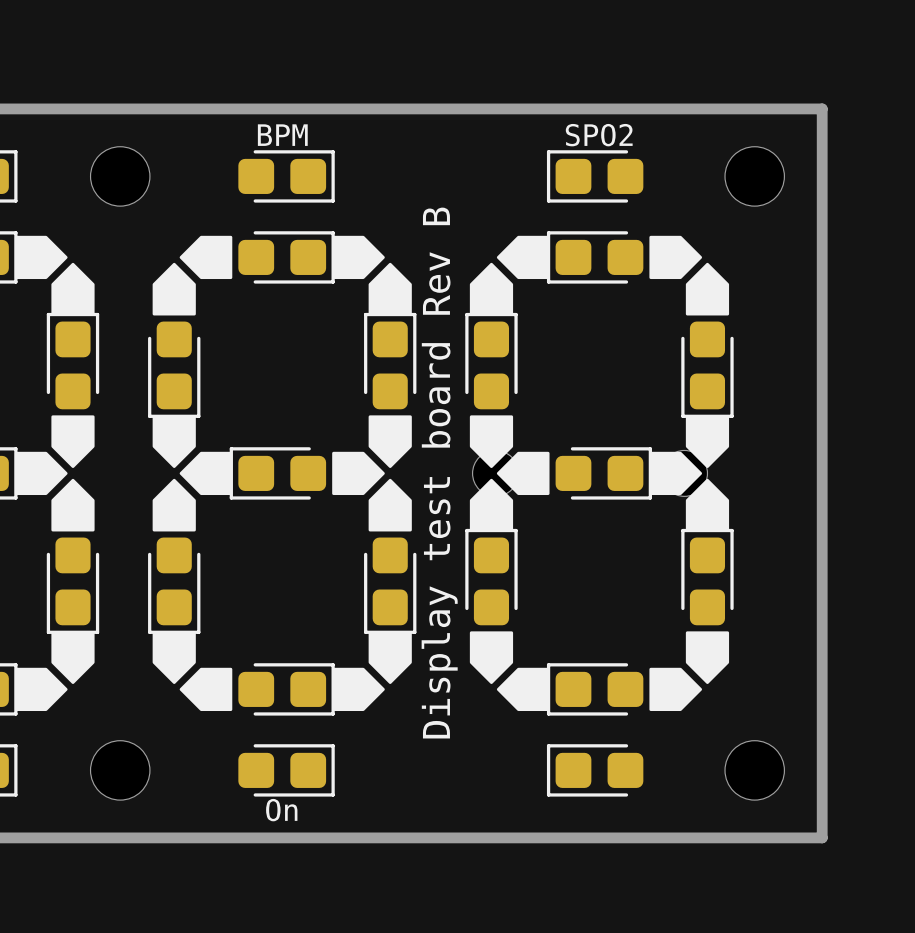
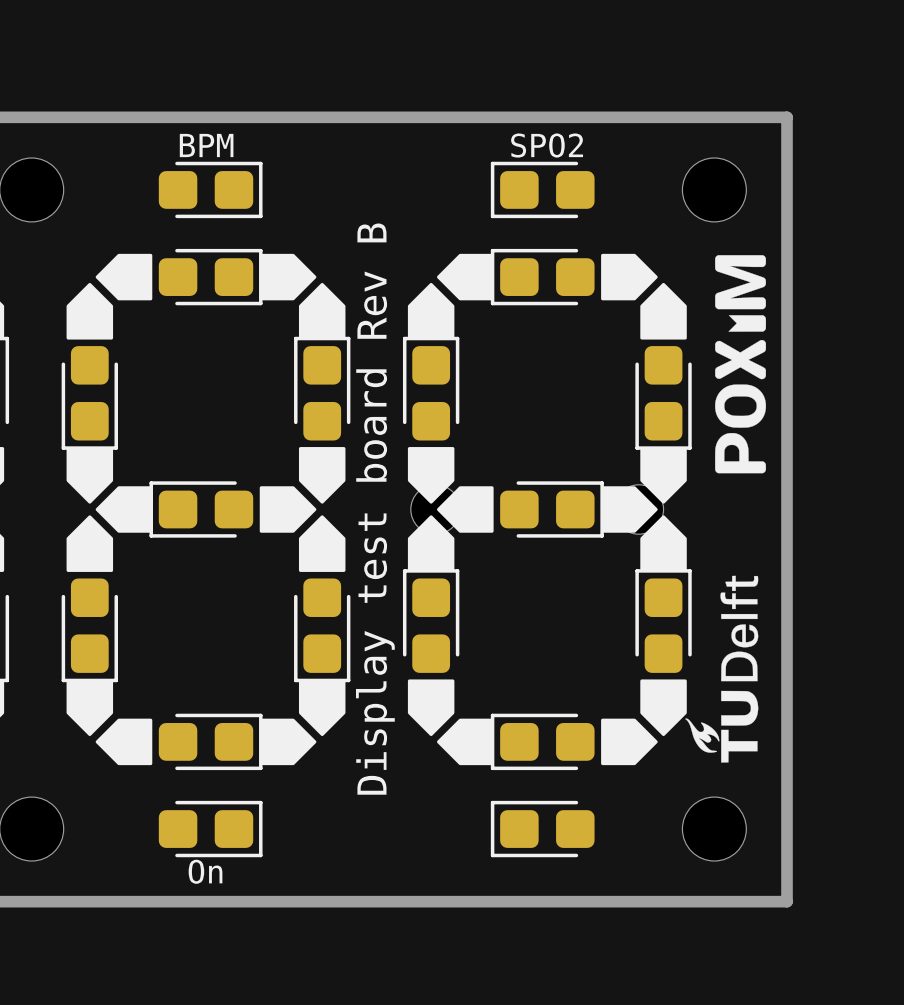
drawing: none -> [715, 255, 767, 474]
drawing: none -> [685, 575, 759, 763]

